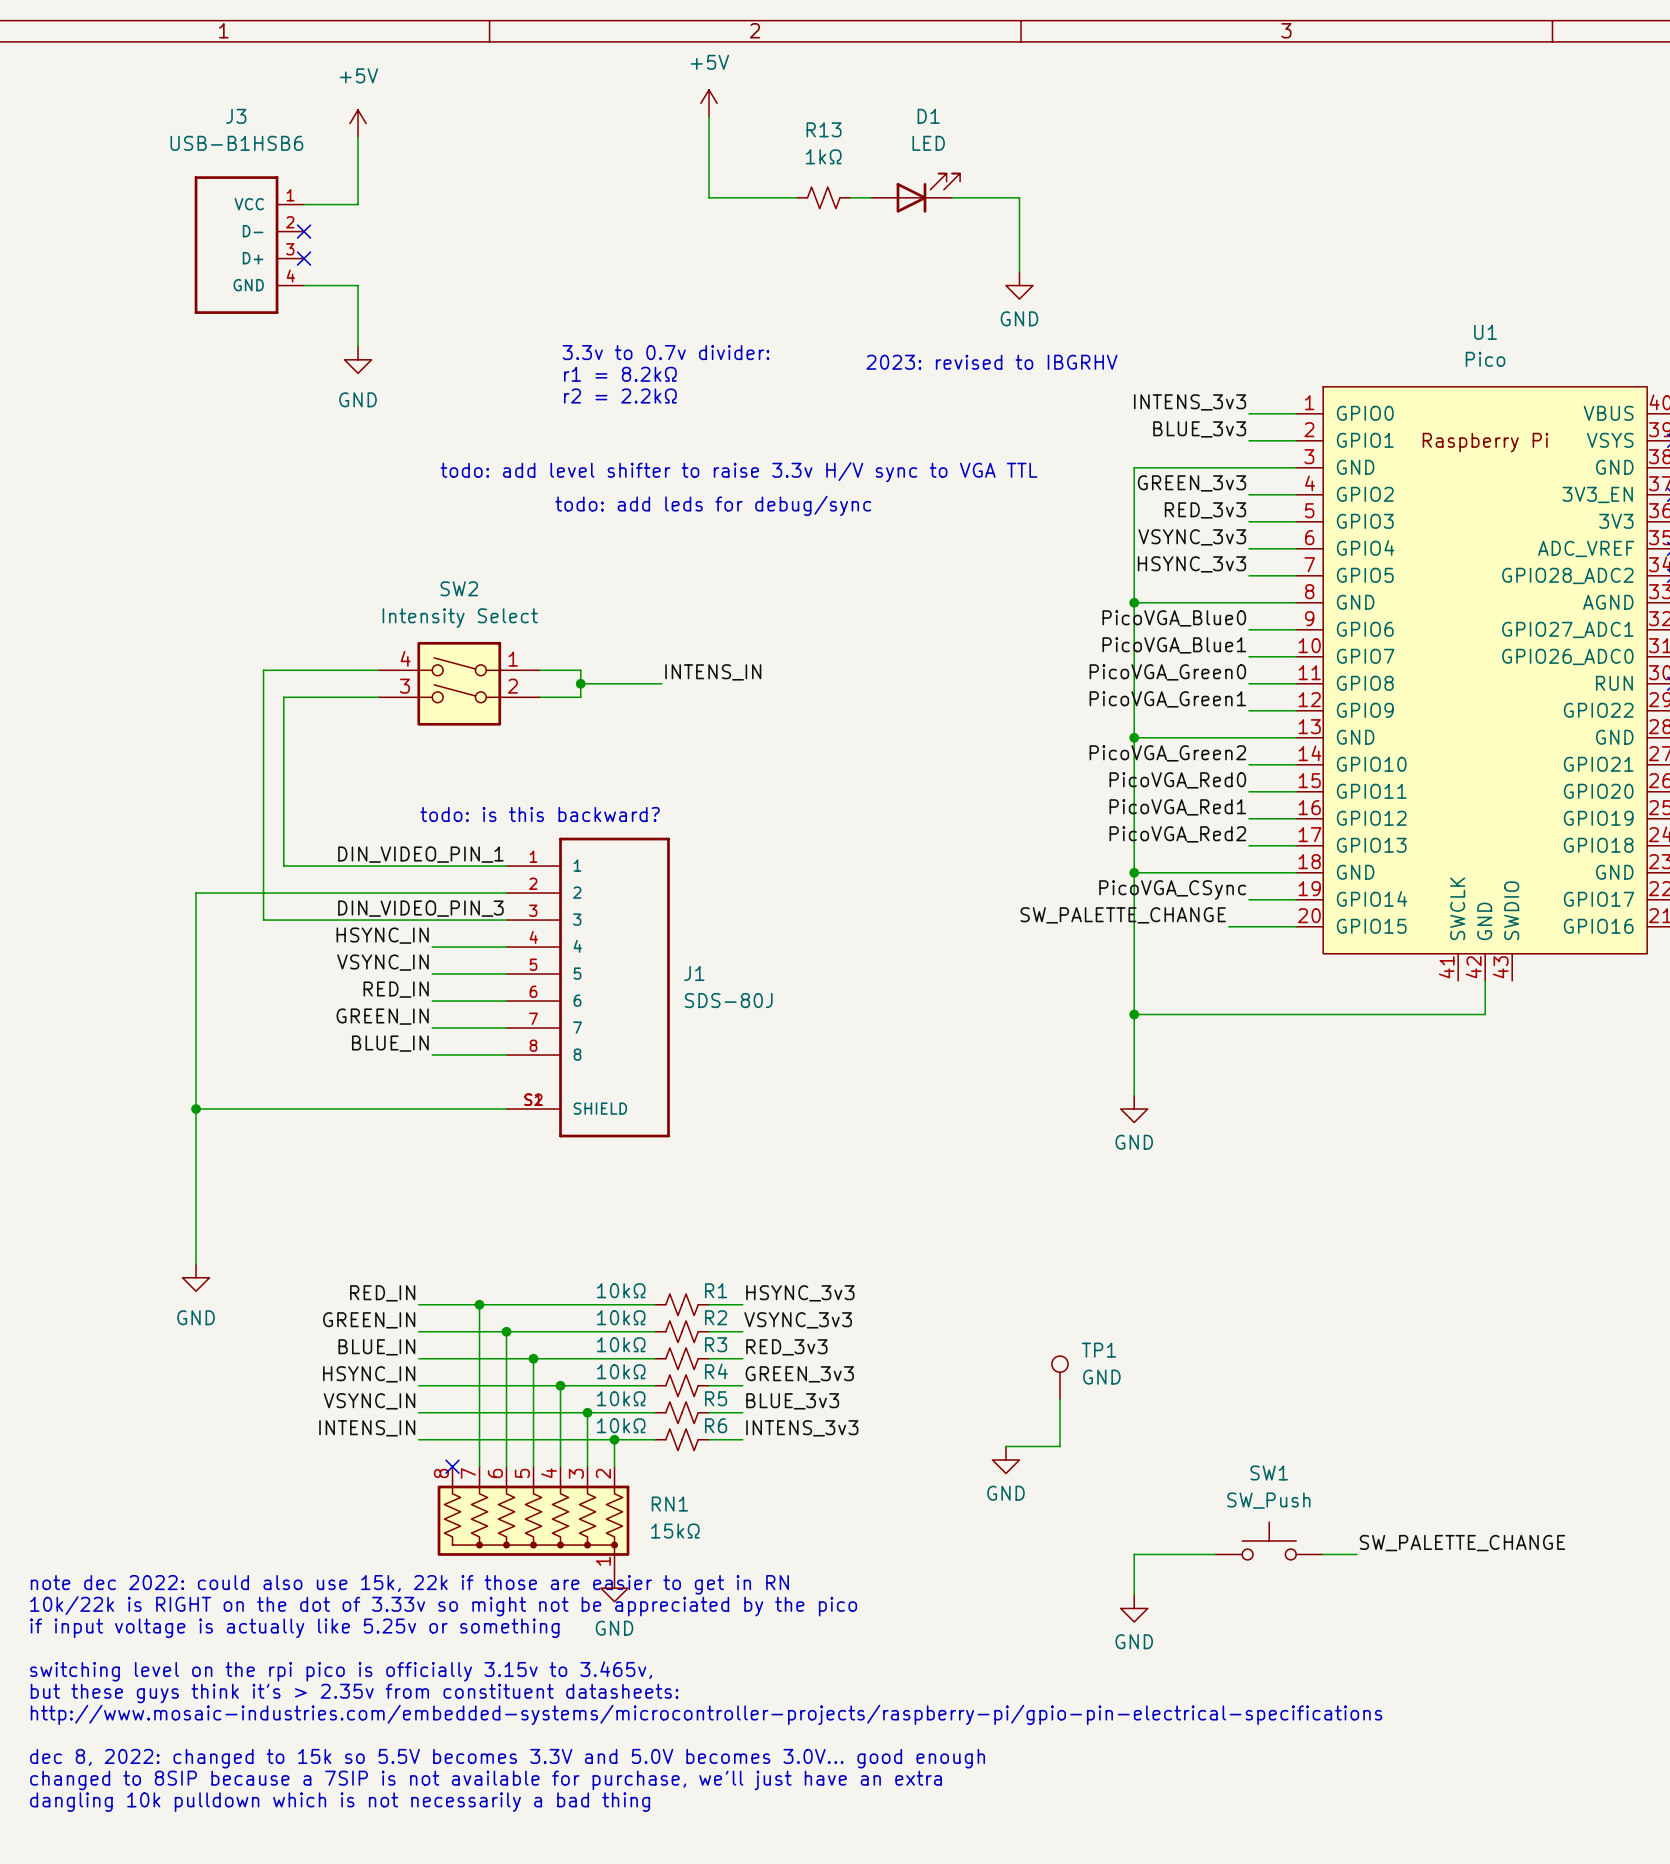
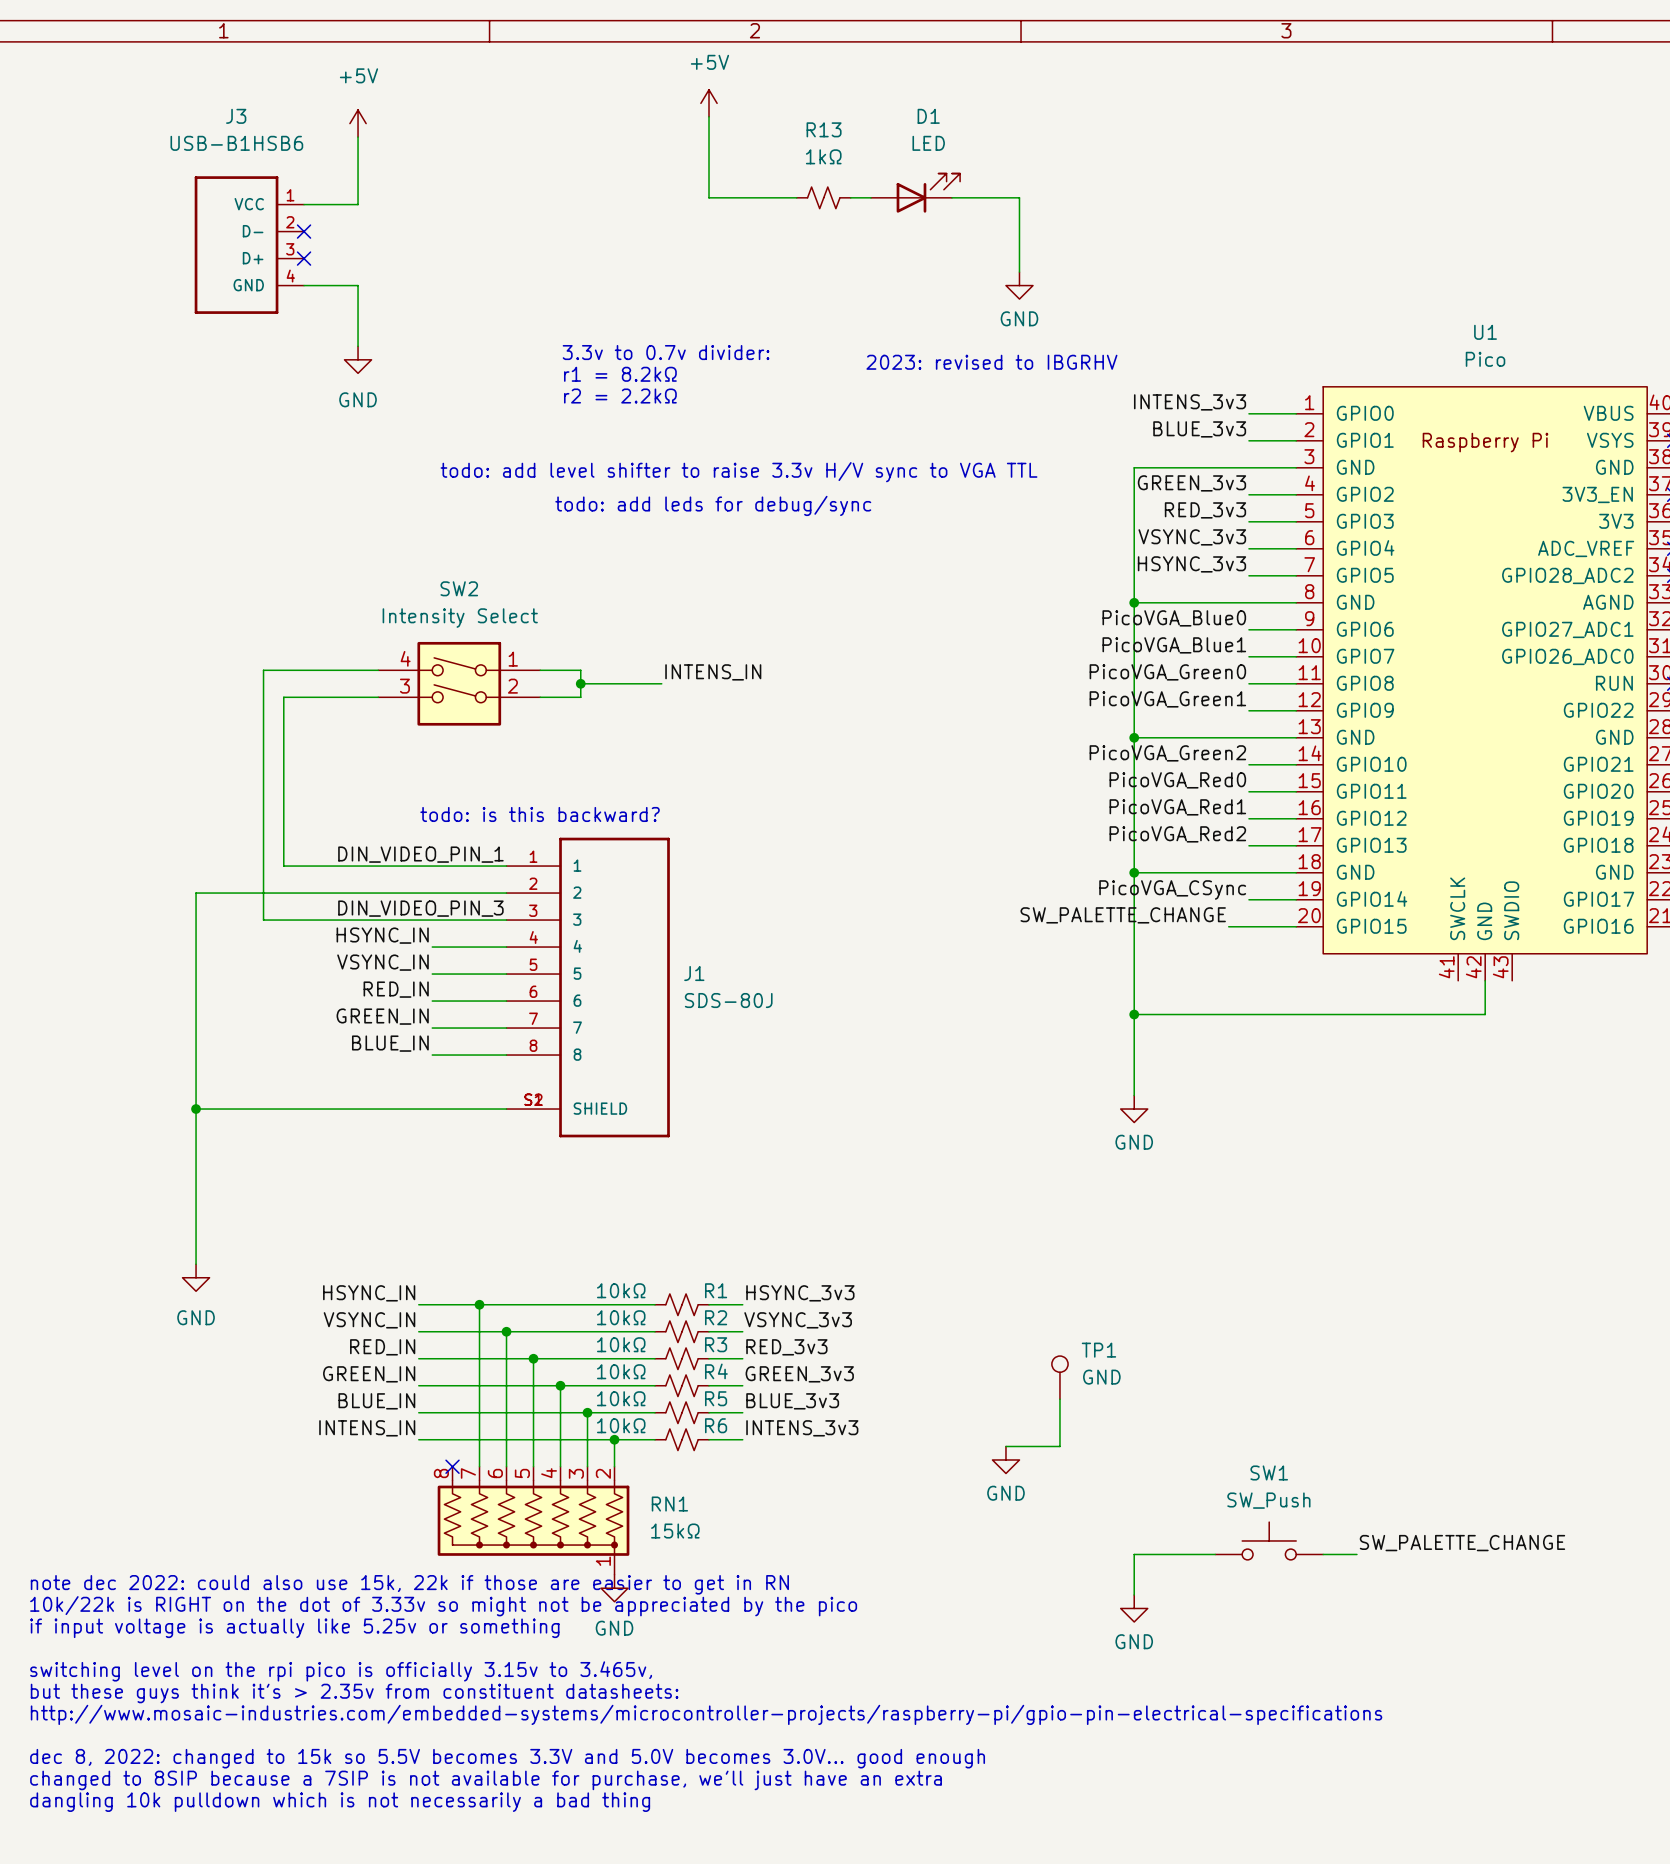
label: RED_IN (382, 1293) -> HSYNC_IN (369, 1293)
label: GREEN_IN (369, 1320) -> VSYNC_IN (369, 1320)
label: BLUE_IN (376, 1347) -> RED_IN (382, 1347)
label: HSYNC_IN (369, 1374) -> GREEN_IN (369, 1374)
label: VSYNC_IN (369, 1401) -> BLUE_IN (376, 1401)

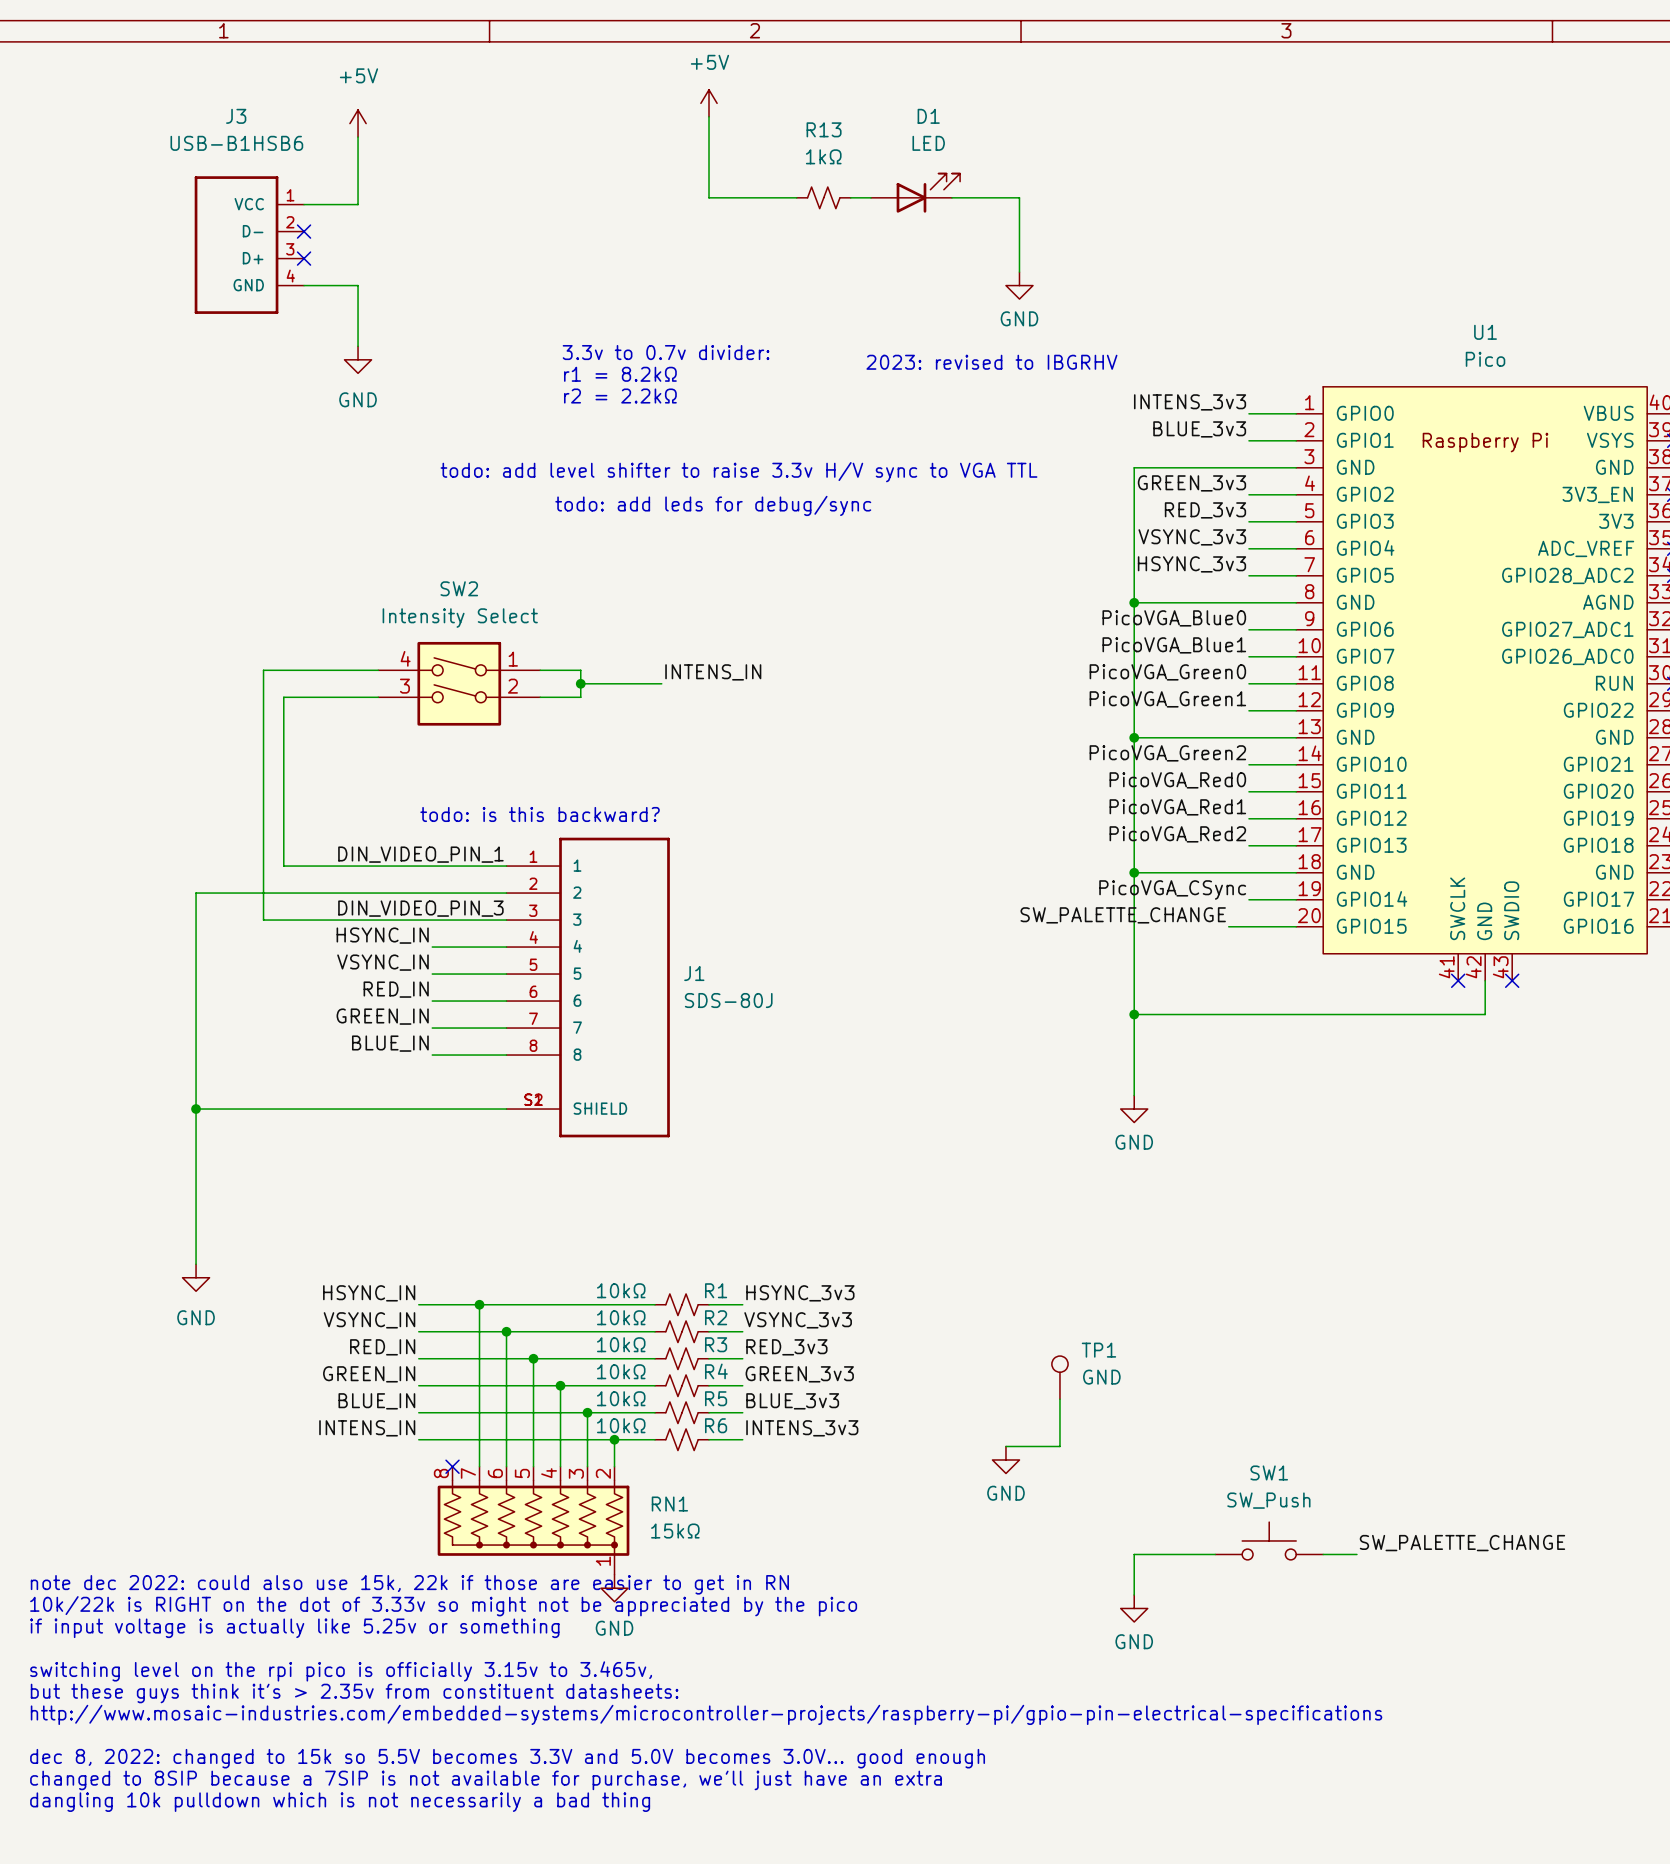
no-connect mark: none -> (1458, 980)
no-connect mark: none -> (1512, 980)

